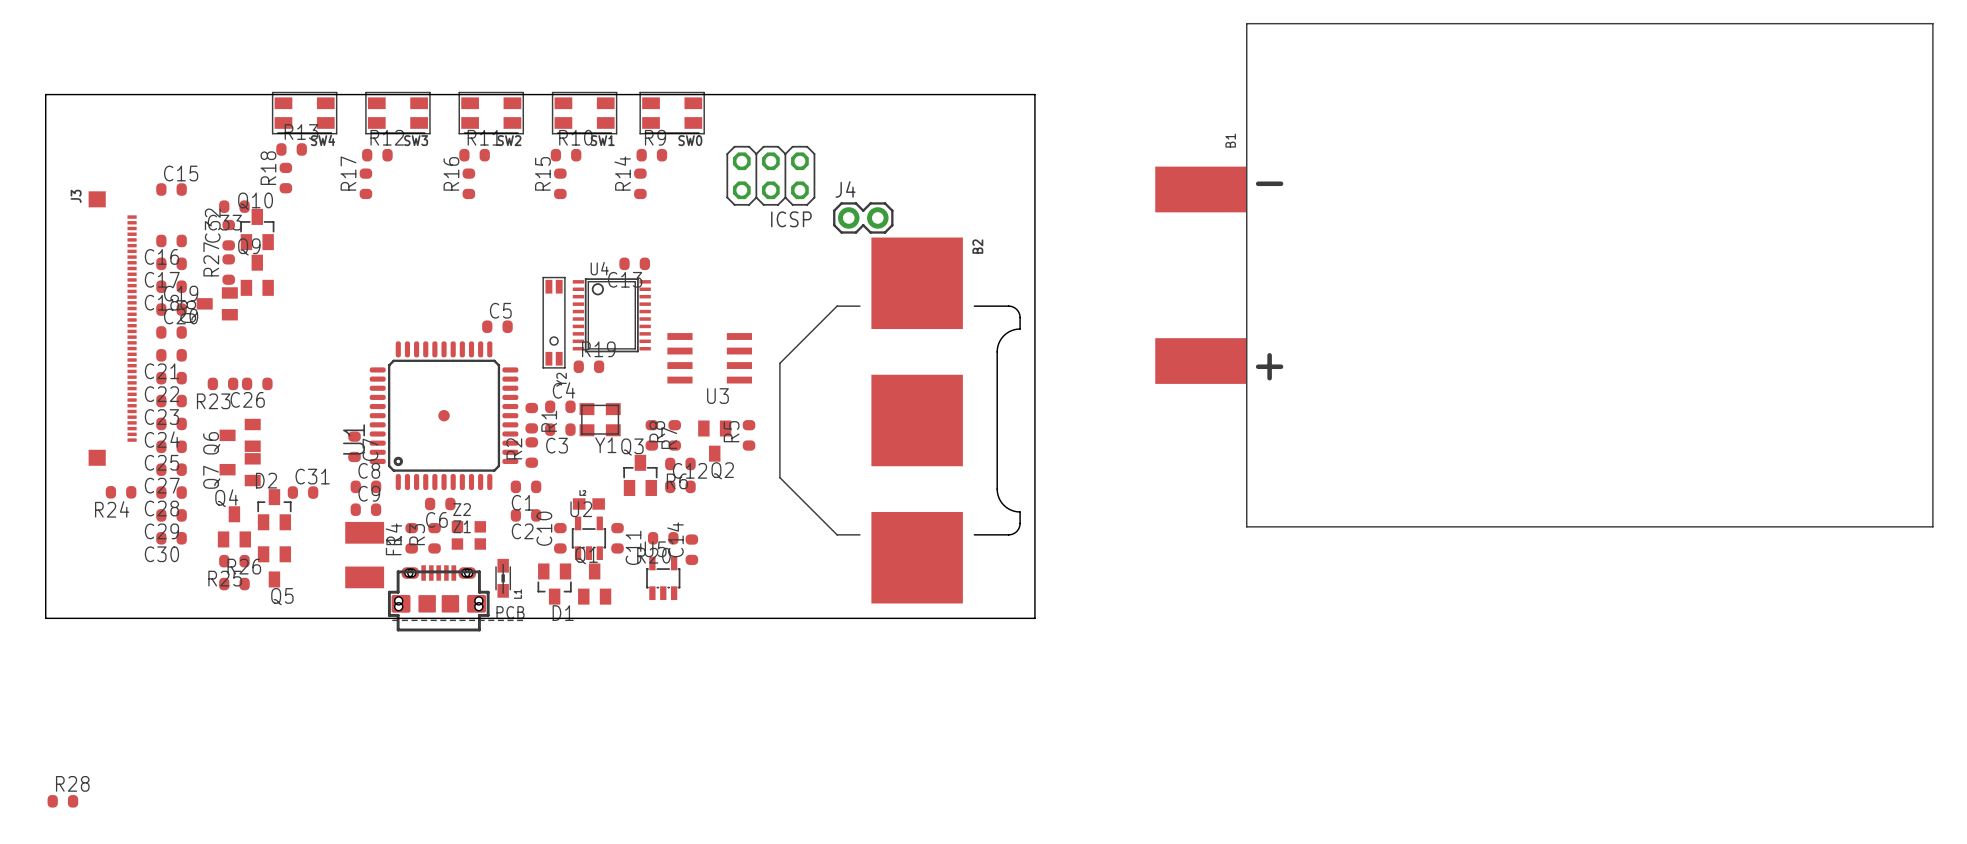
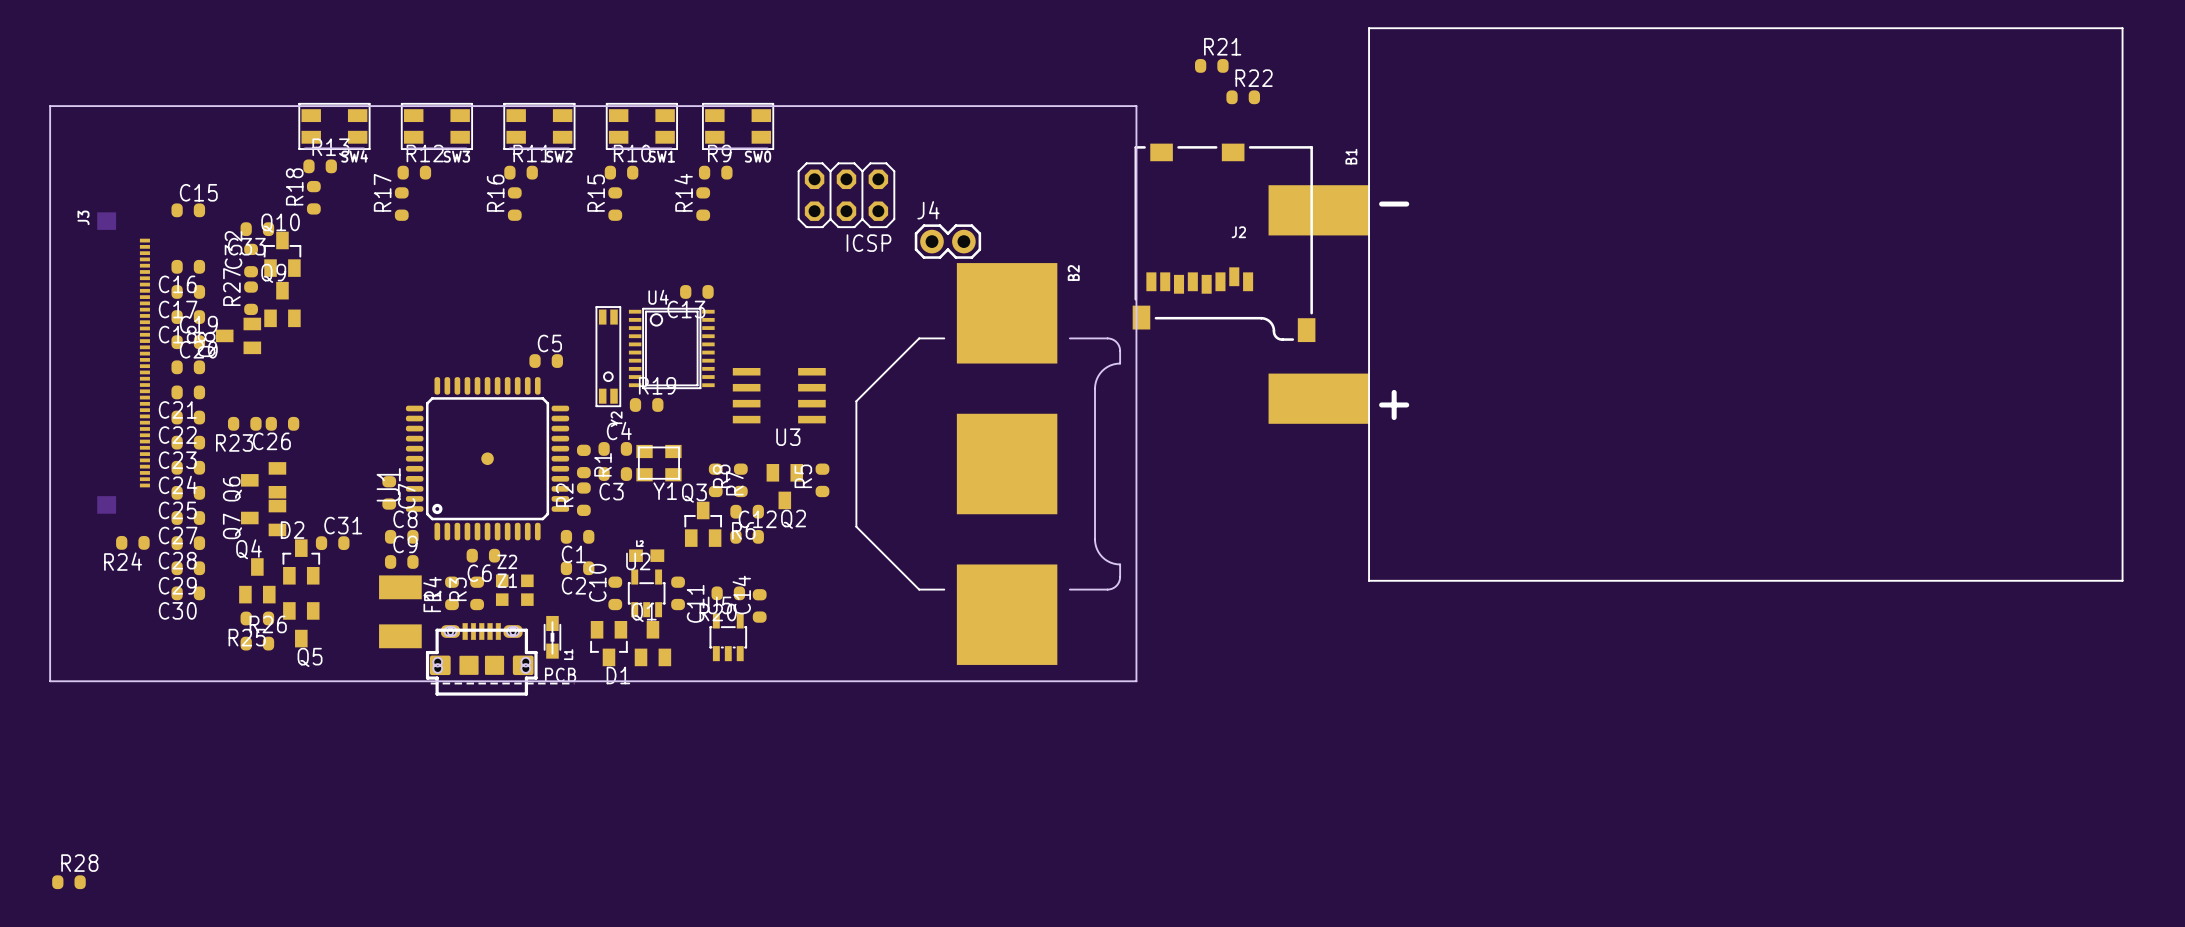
R21: none -> (1211, 65)
R22: none -> (1243, 97)
J2: none -> (1224, 242)

